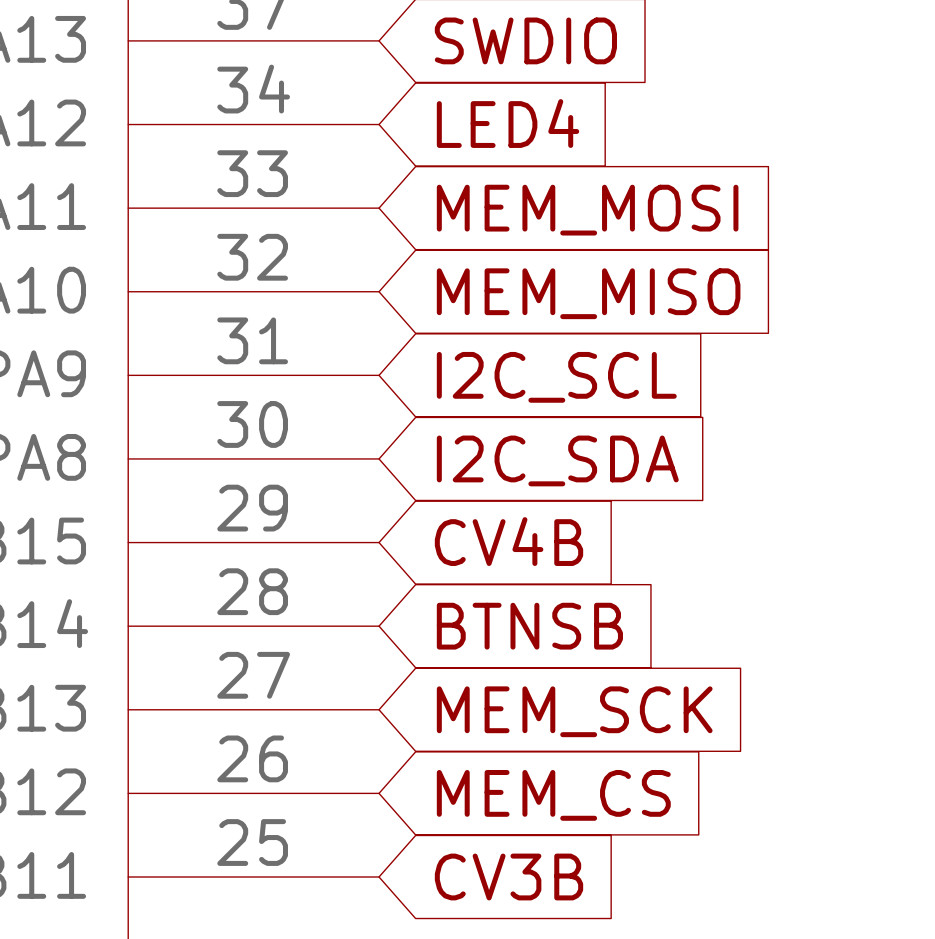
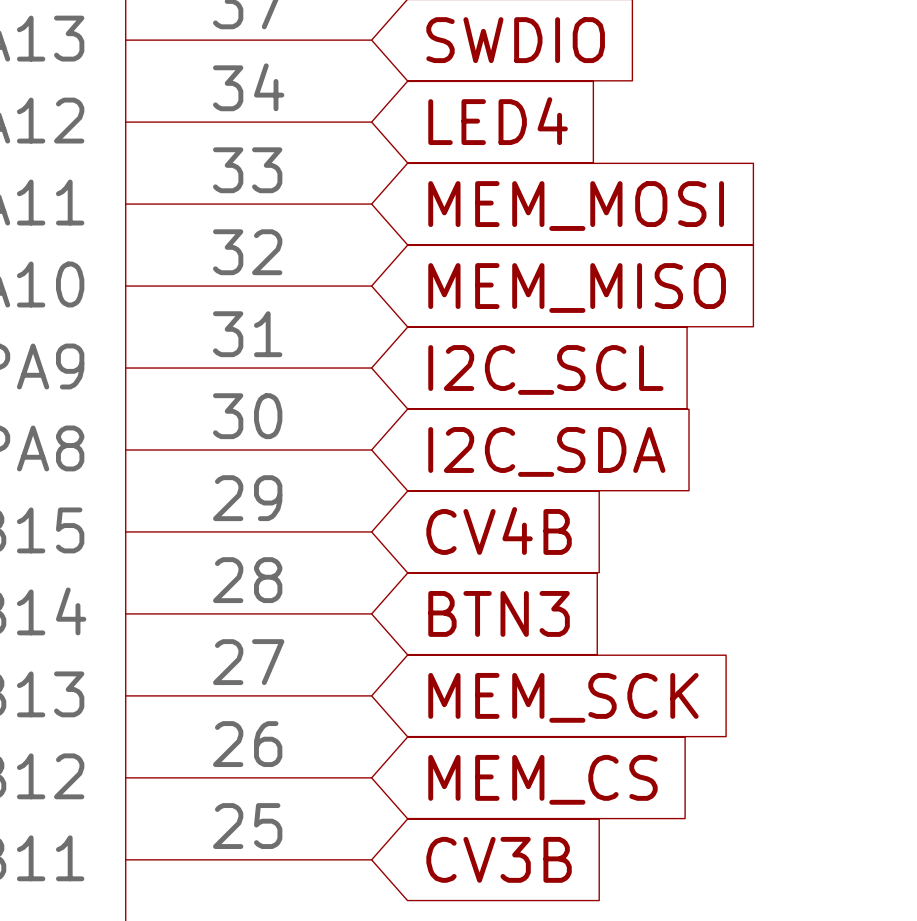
global label: BTNSB (529, 626) -> BTN3 (499, 613)

